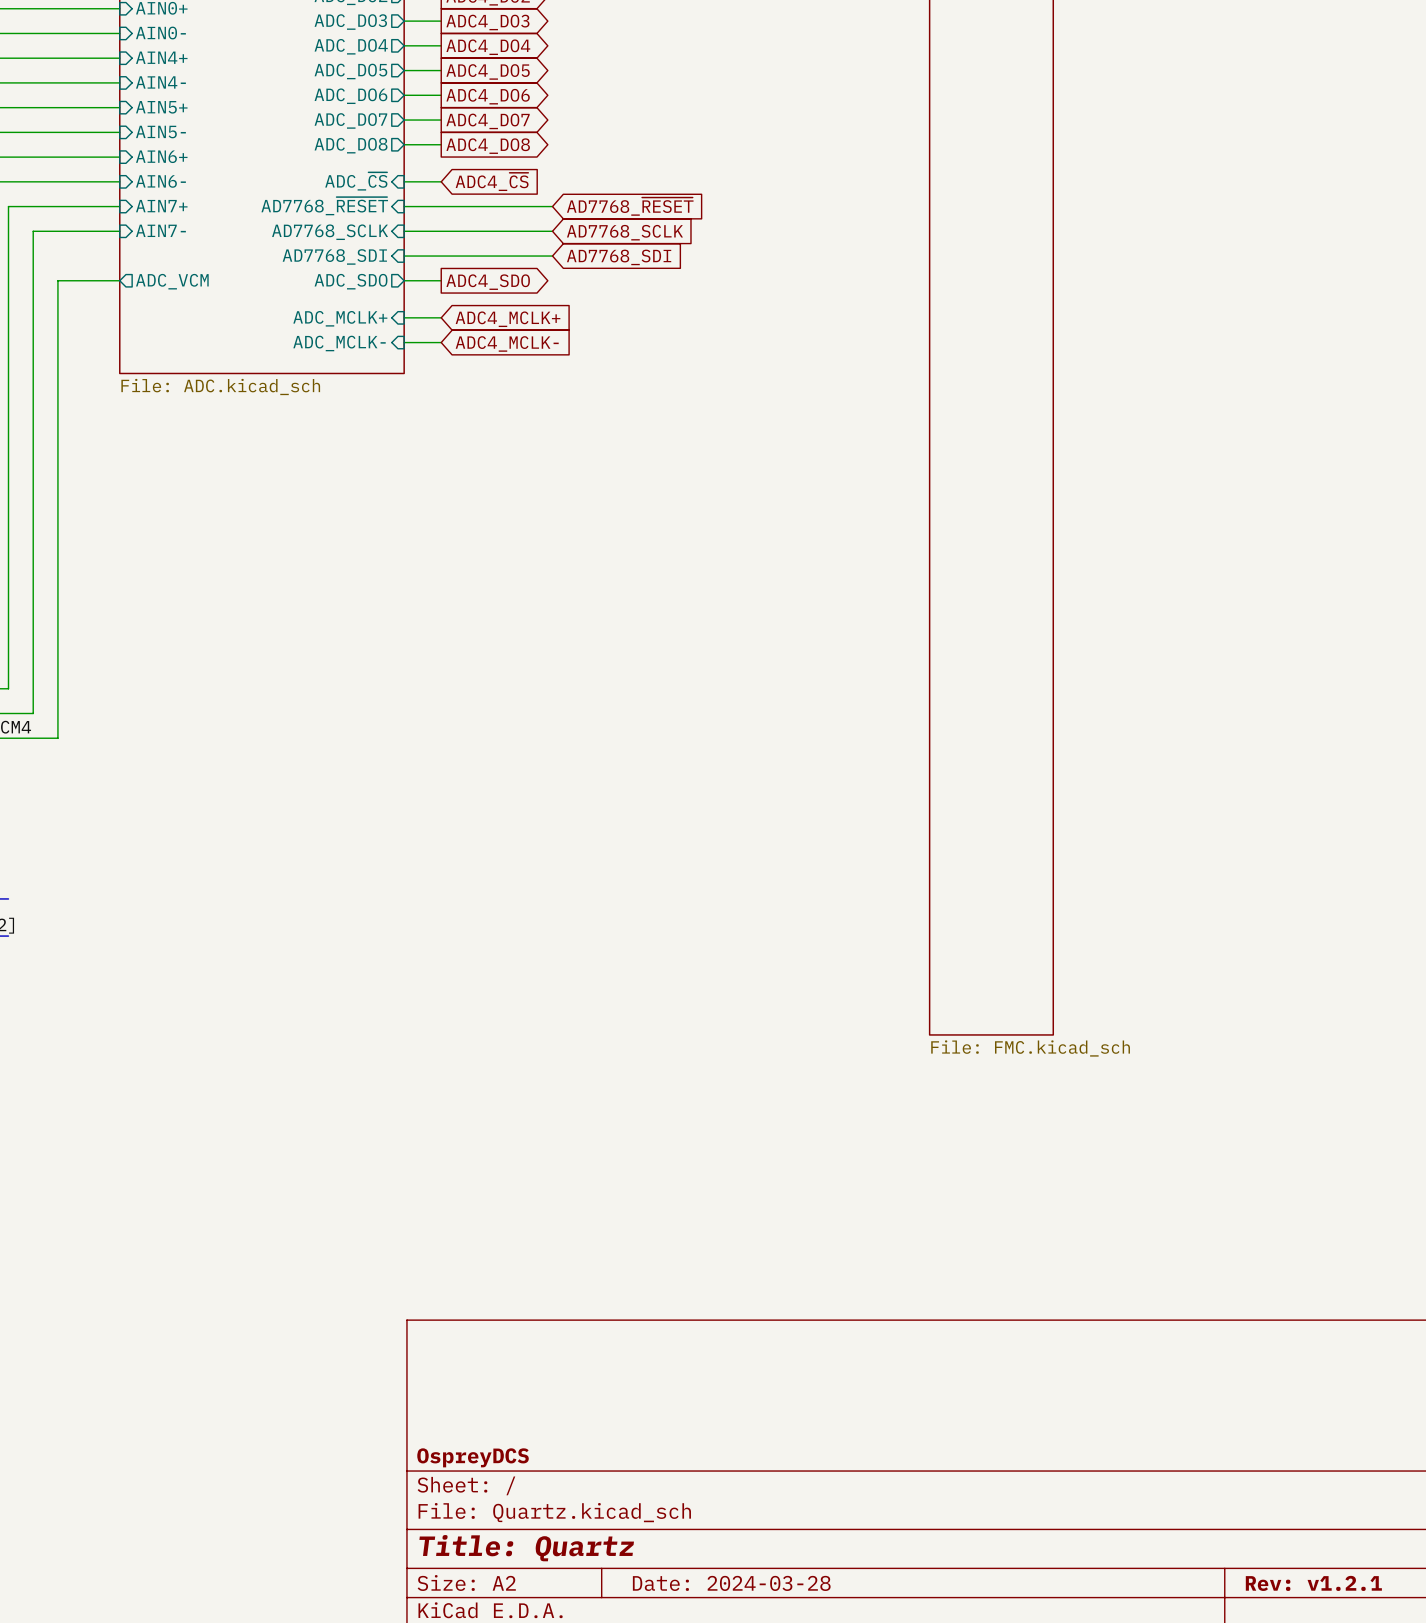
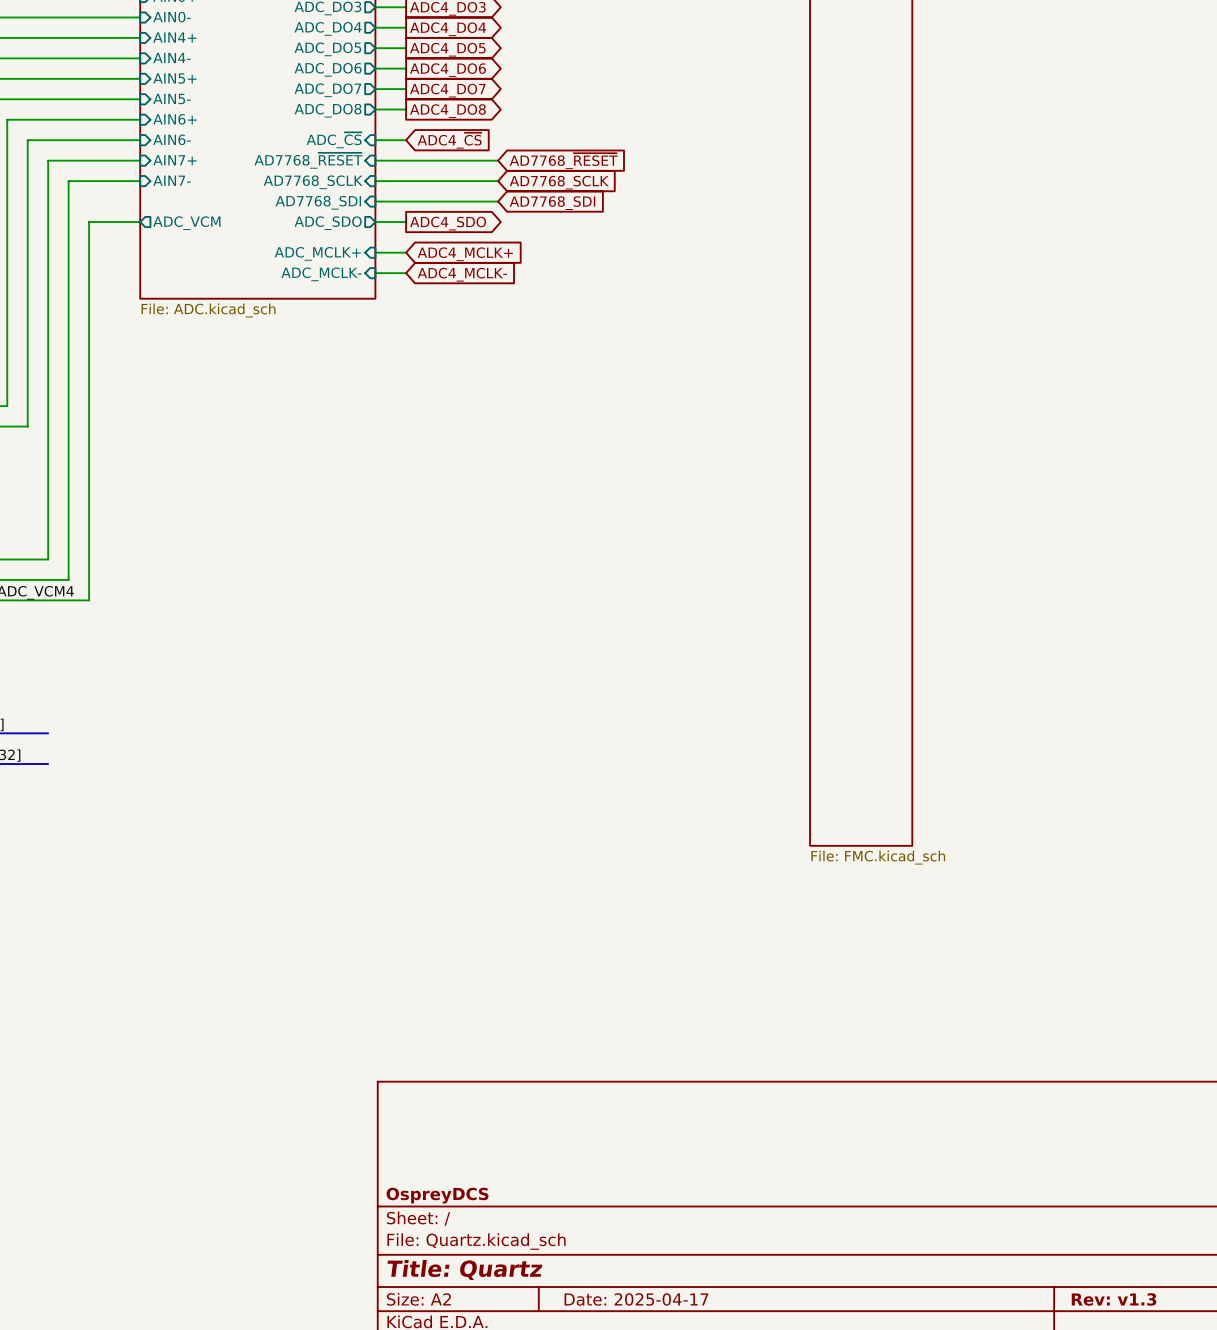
title block: Date: 2024-03-28 (731, 1583) -> Date: 2025-04-17 (636, 1299)
title block: Rev: v1.2.1 (1313, 1583) -> Rev: v1.3 (1114, 1299)

